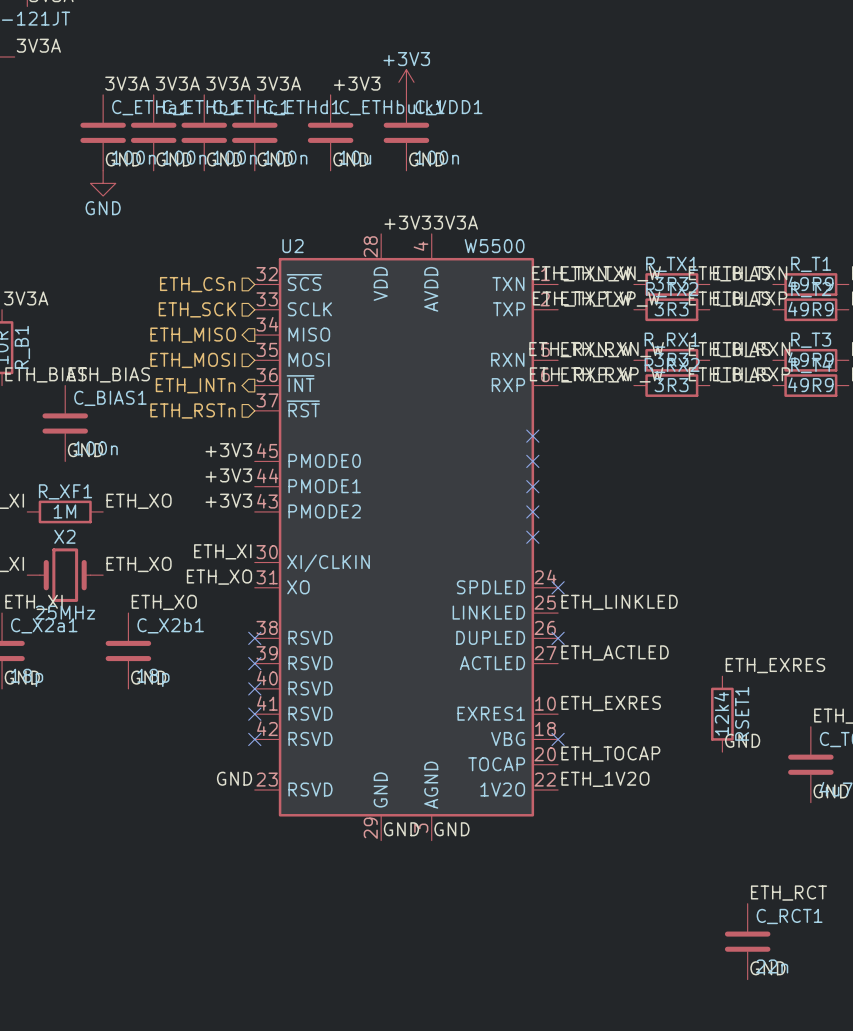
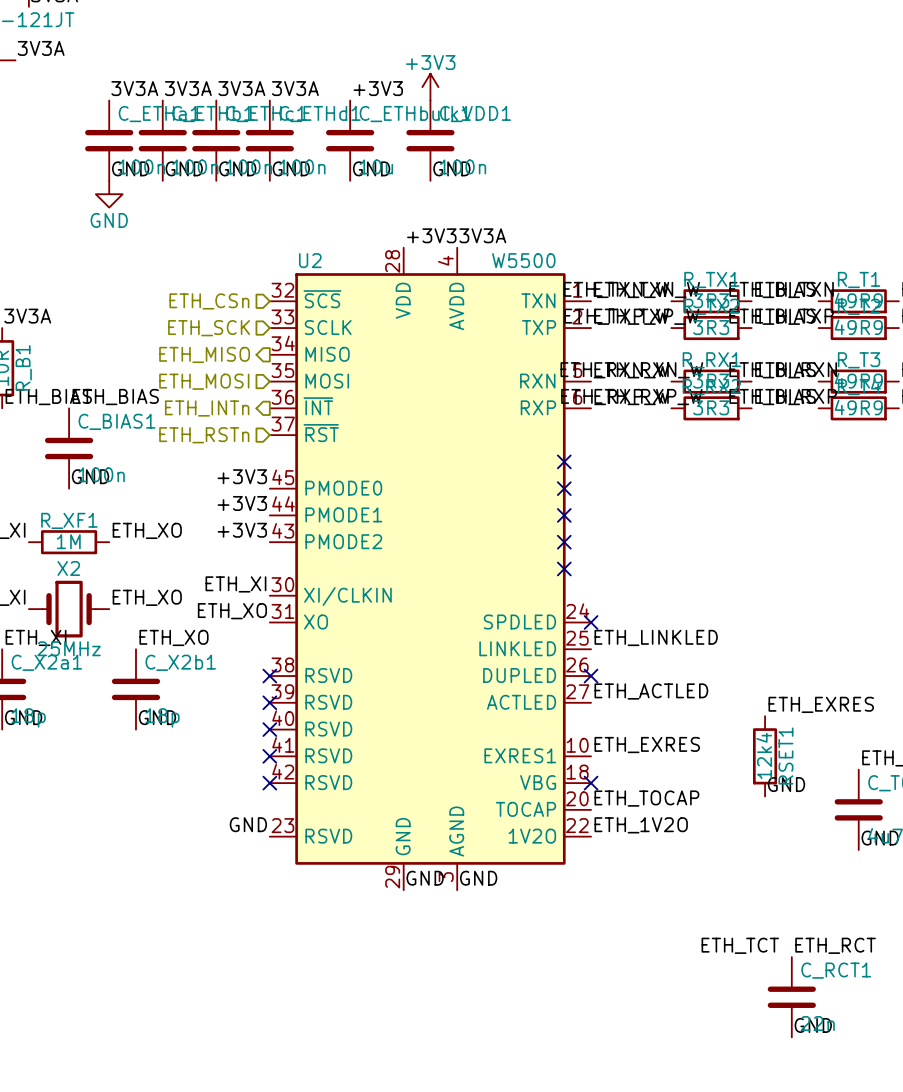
label: none -> ETH_TCT (740, 945)

